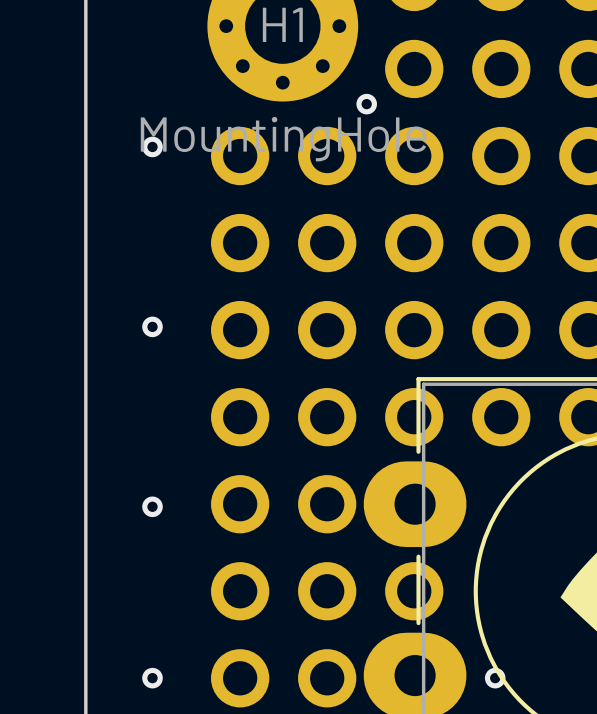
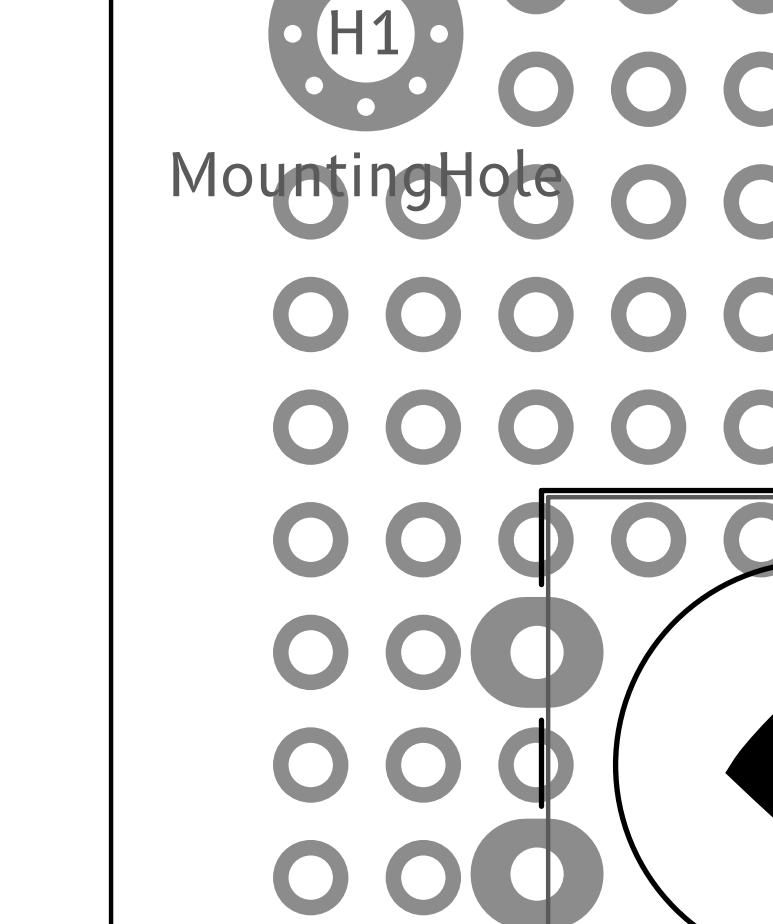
via: (366, 104) -> none
via: (152, 146) -> none
via: (152, 326) -> none
via: (152, 506) -> none
via: (152, 678) -> none
via: (495, 678) -> none

